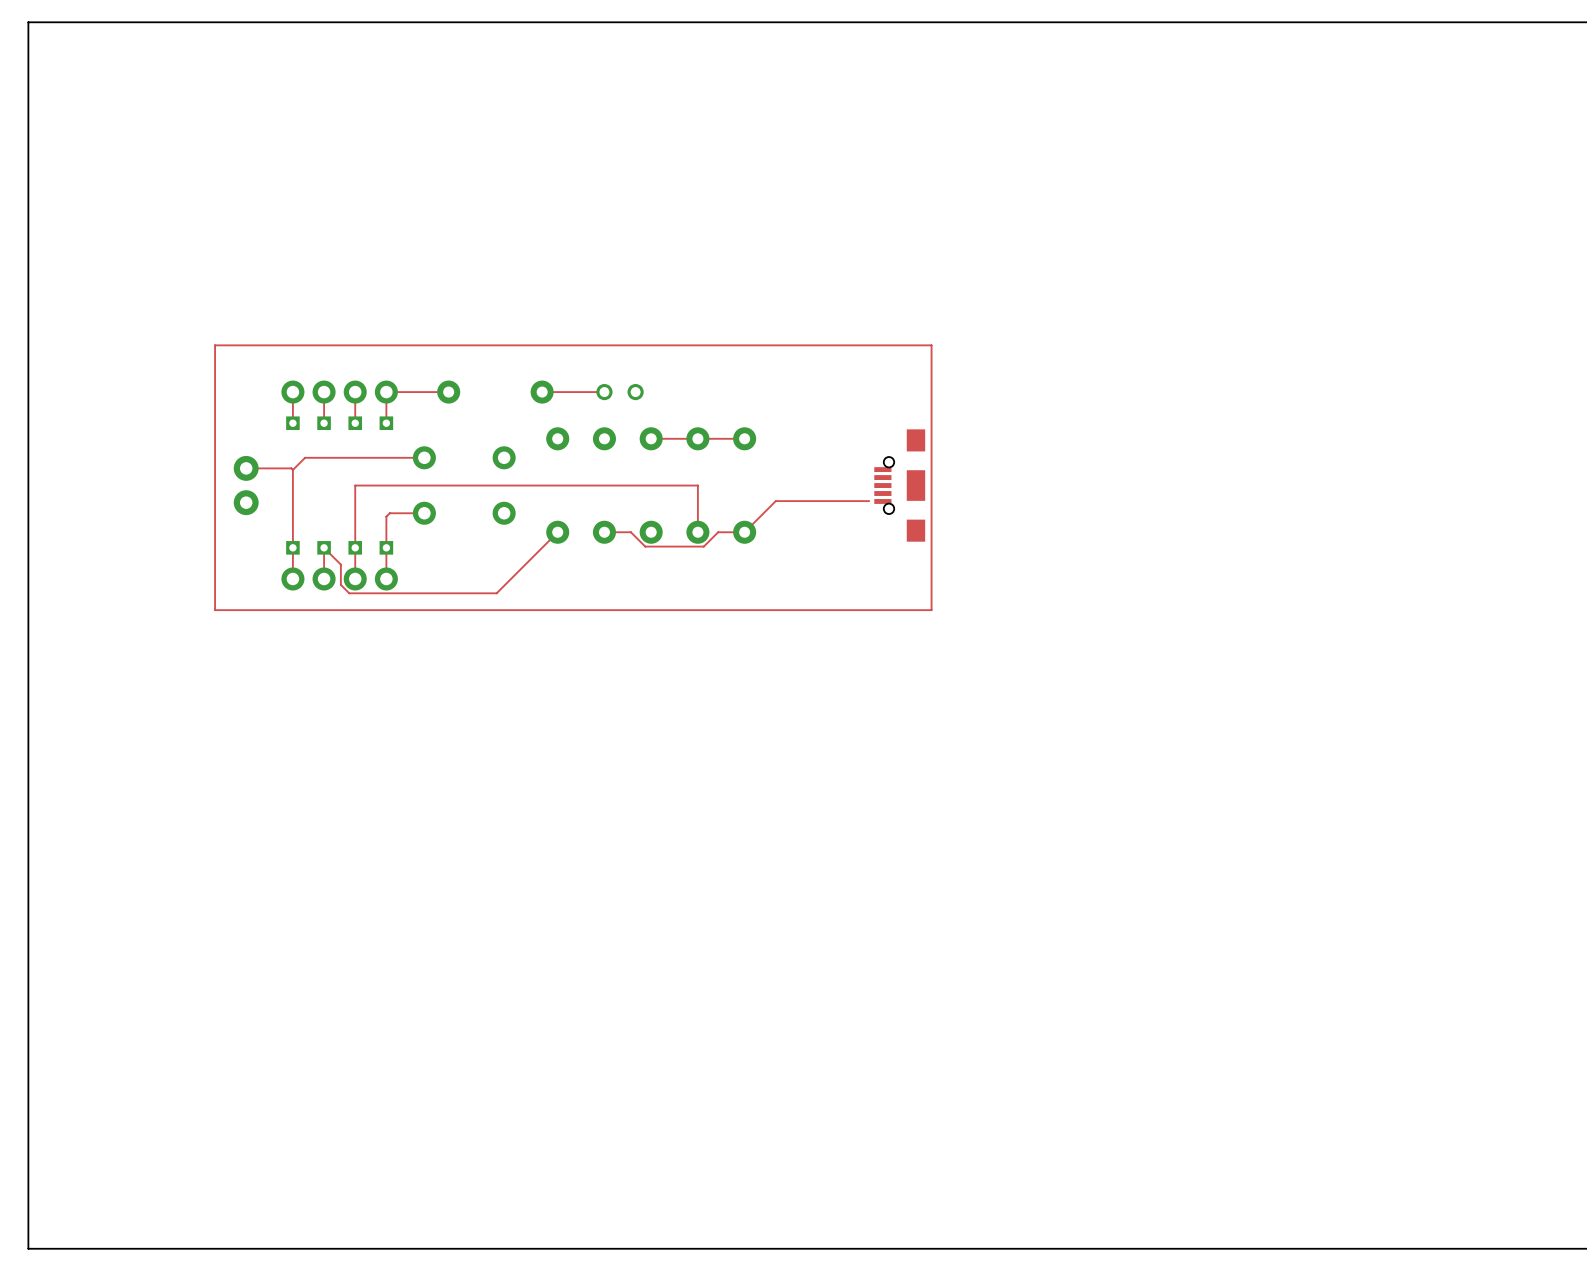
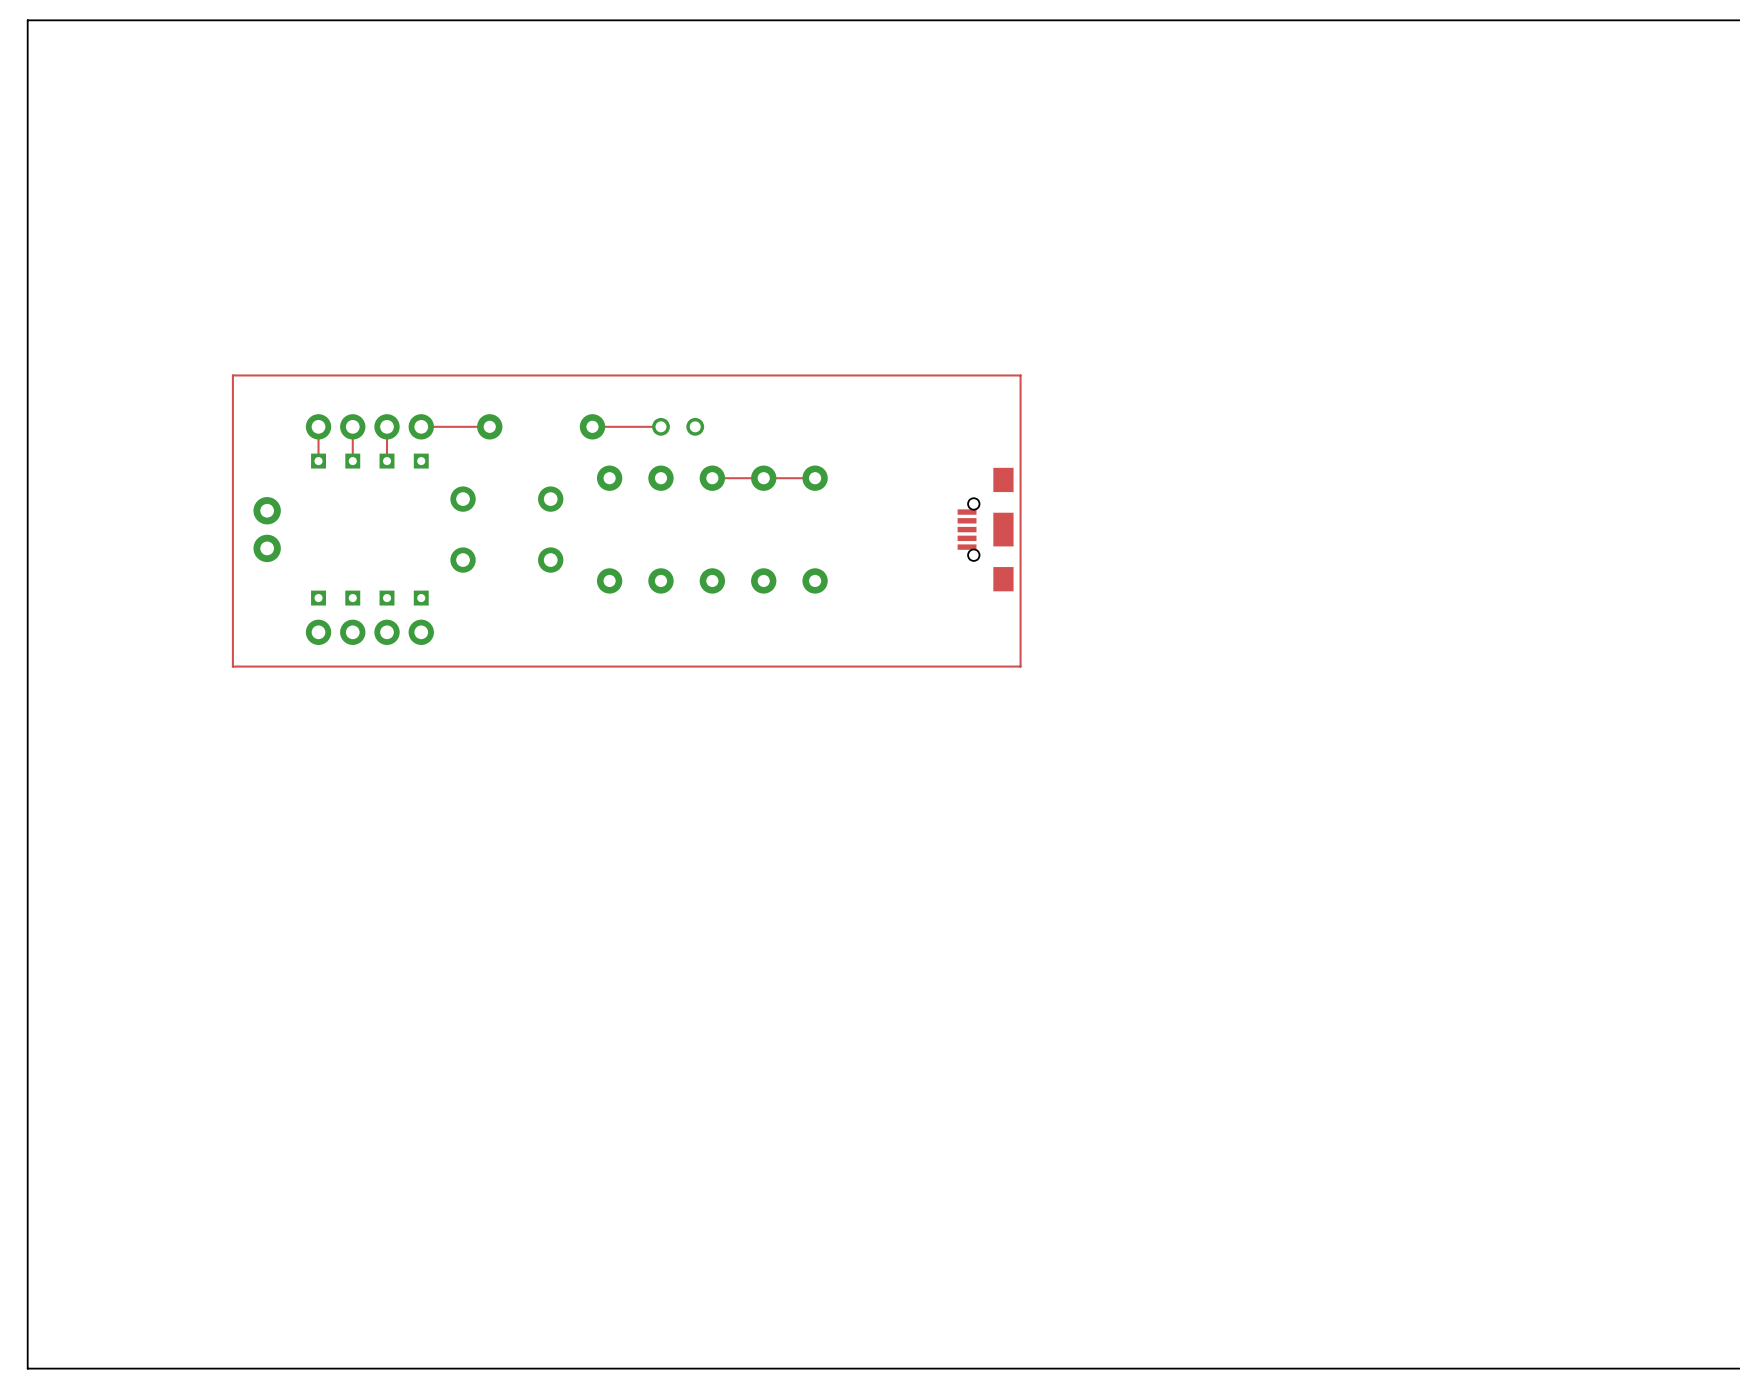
top track: (386, 392) (386, 423) -> none
top track: (424, 457) (305, 457) (292, 469) -> none
top track: (246, 468) (291, 468) (292, 469) -> none
top track: (292, 469) (292, 578) -> none
top track: (869, 501) (775, 501) (744, 532) (718, 532) (703, 546) (645, 546) (630, 532) (604, 532) -> none
top track: (424, 513) (389, 513) (386, 516) (386, 578) -> none
top track: (557, 532) (496, 593) (349, 593) (340, 584) (340, 564) (324, 547) (324, 578) -> none
top track: (697, 532) (697, 485) (355, 485) (355, 578) -> none

